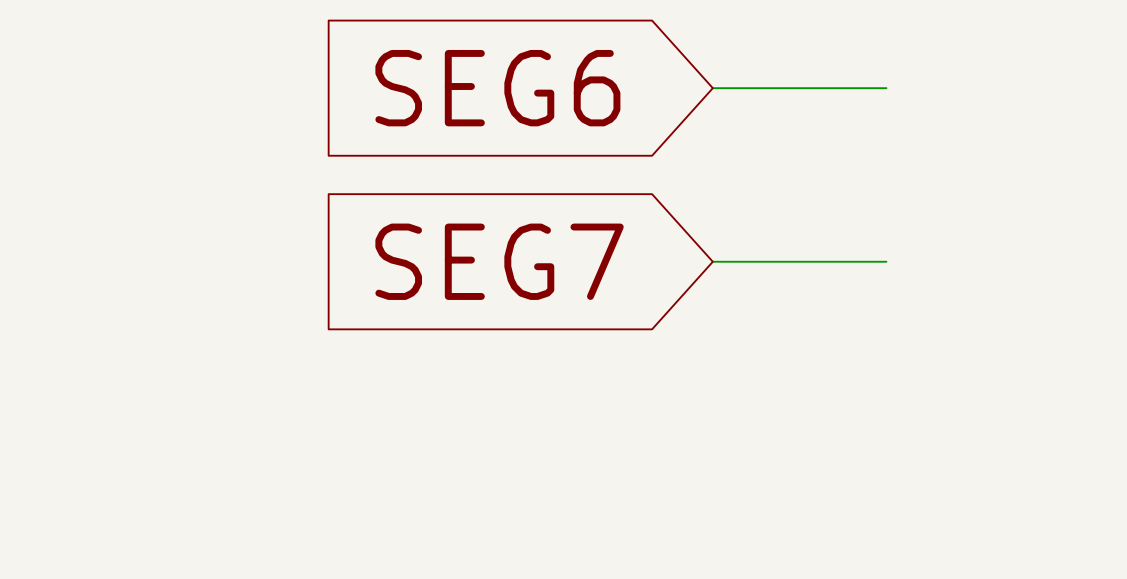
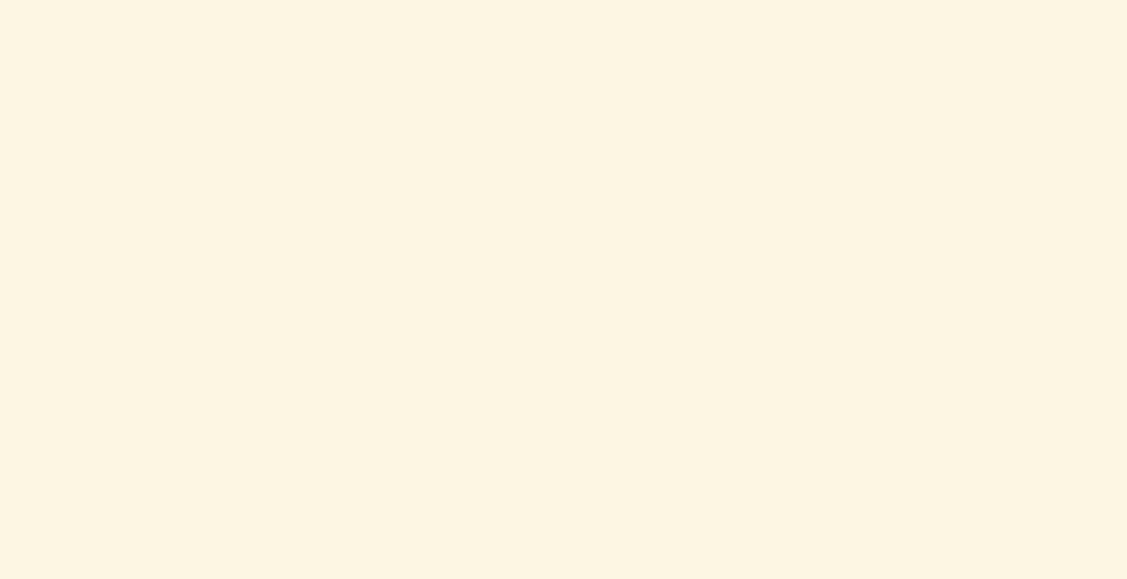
global label: SEG6 (497, 88) -> none
wire: (712, 88) (886, 88) -> none
global label: SEG7 (499, 261) -> none
wire: (712, 261) (886, 261) -> none

